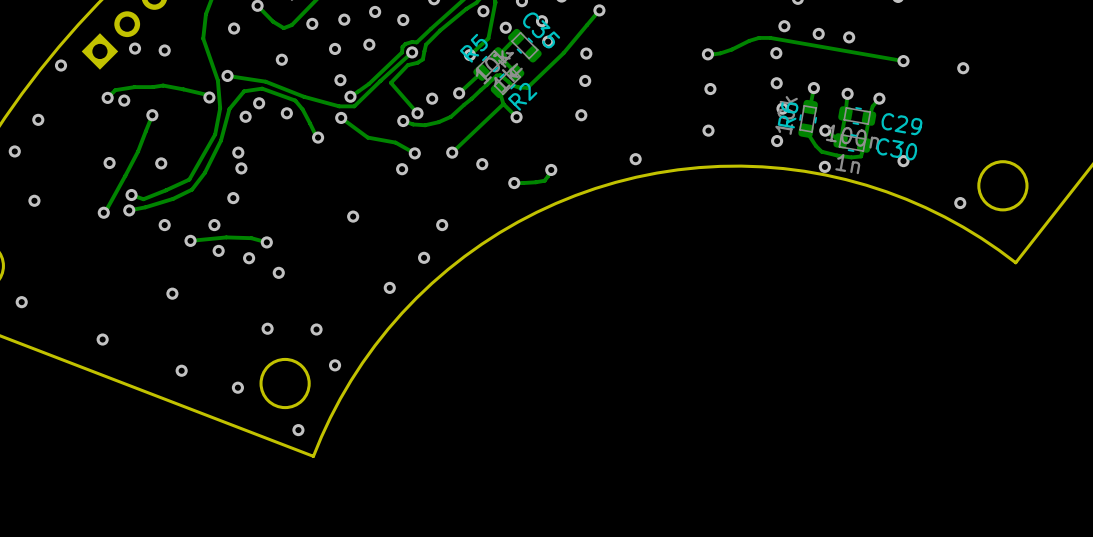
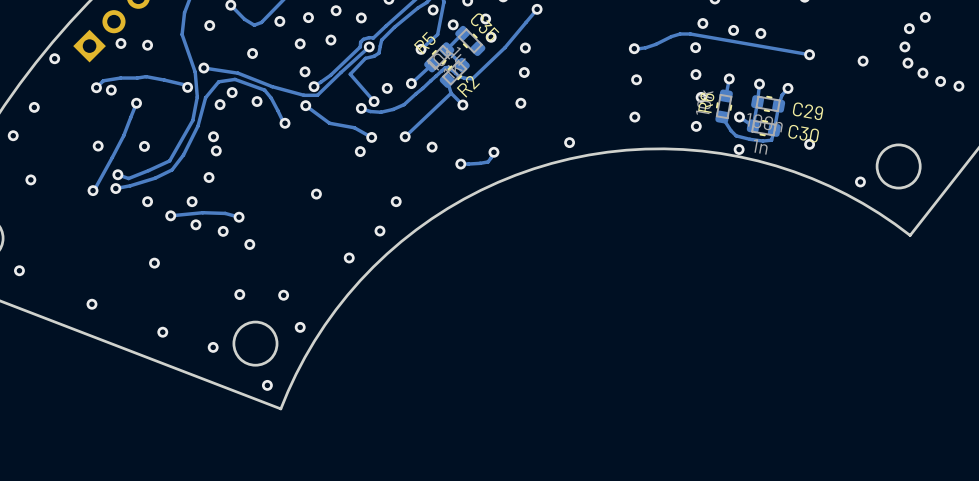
via: none -> (925, 17)
via: none -> (909, 28)
via: none -> (904, 46)
via: none -> (907, 63)
via: none -> (922, 73)
via: none -> (940, 81)
via: none -> (958, 86)

